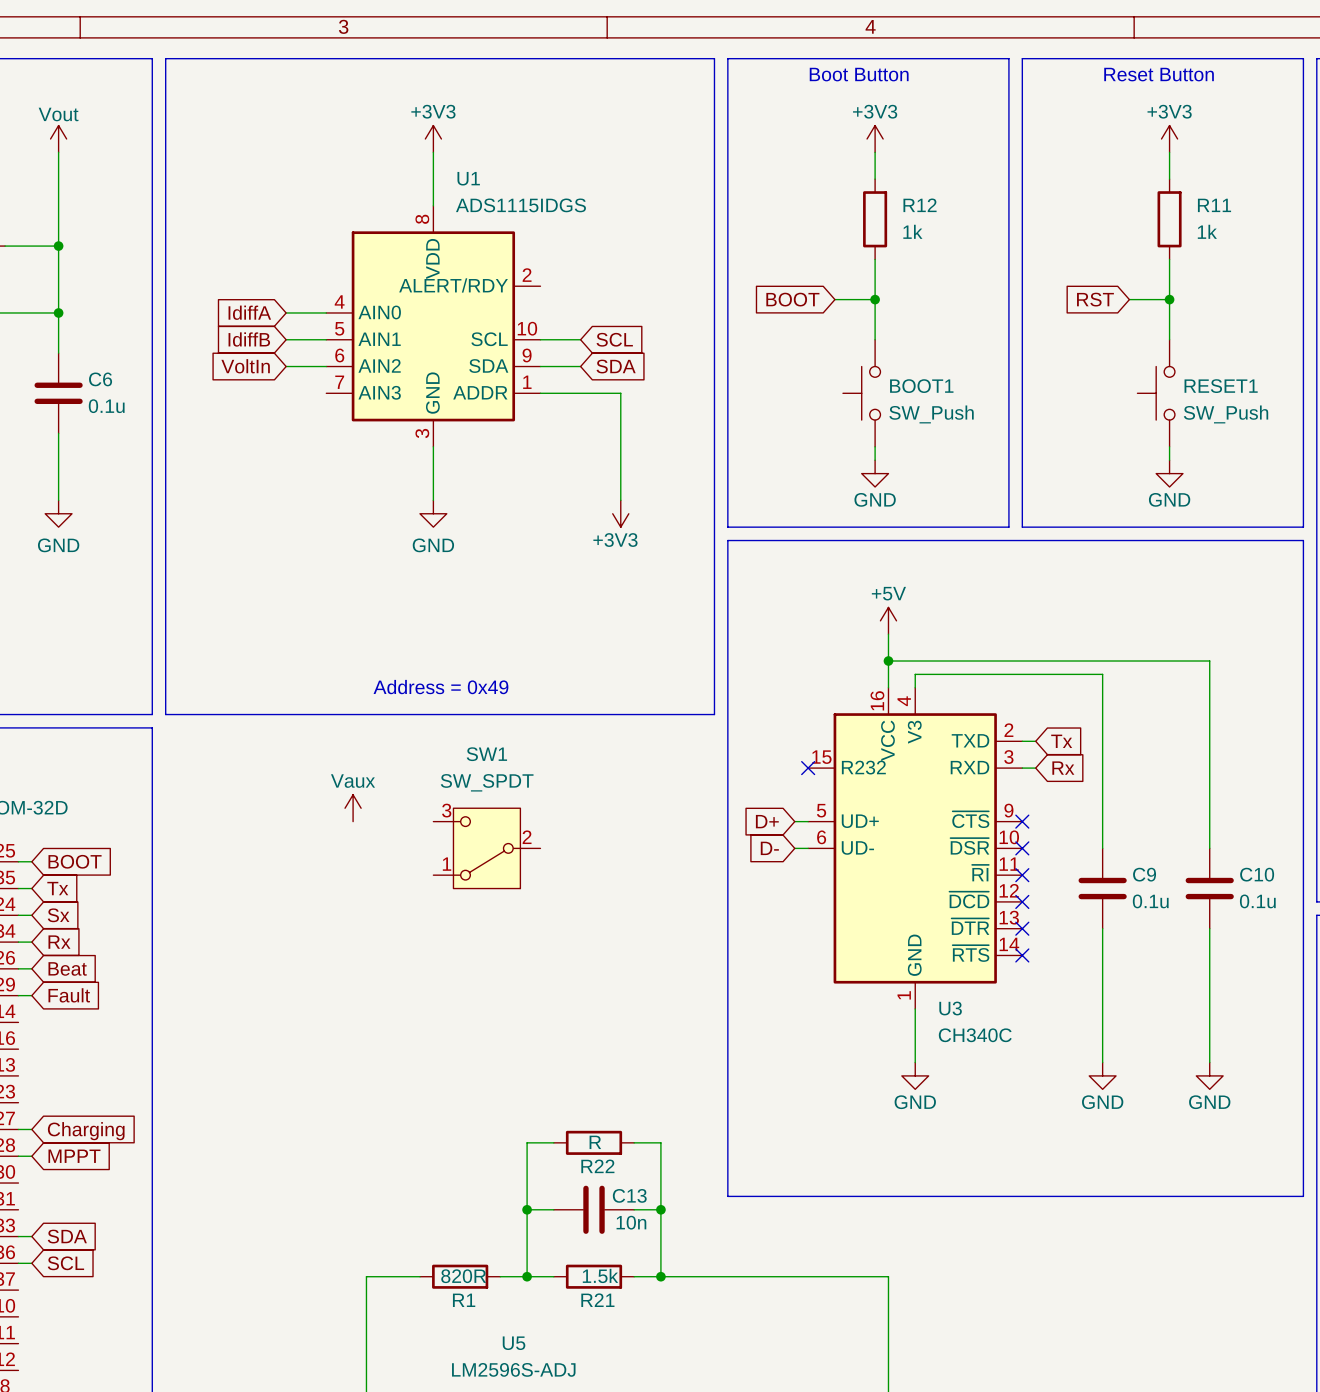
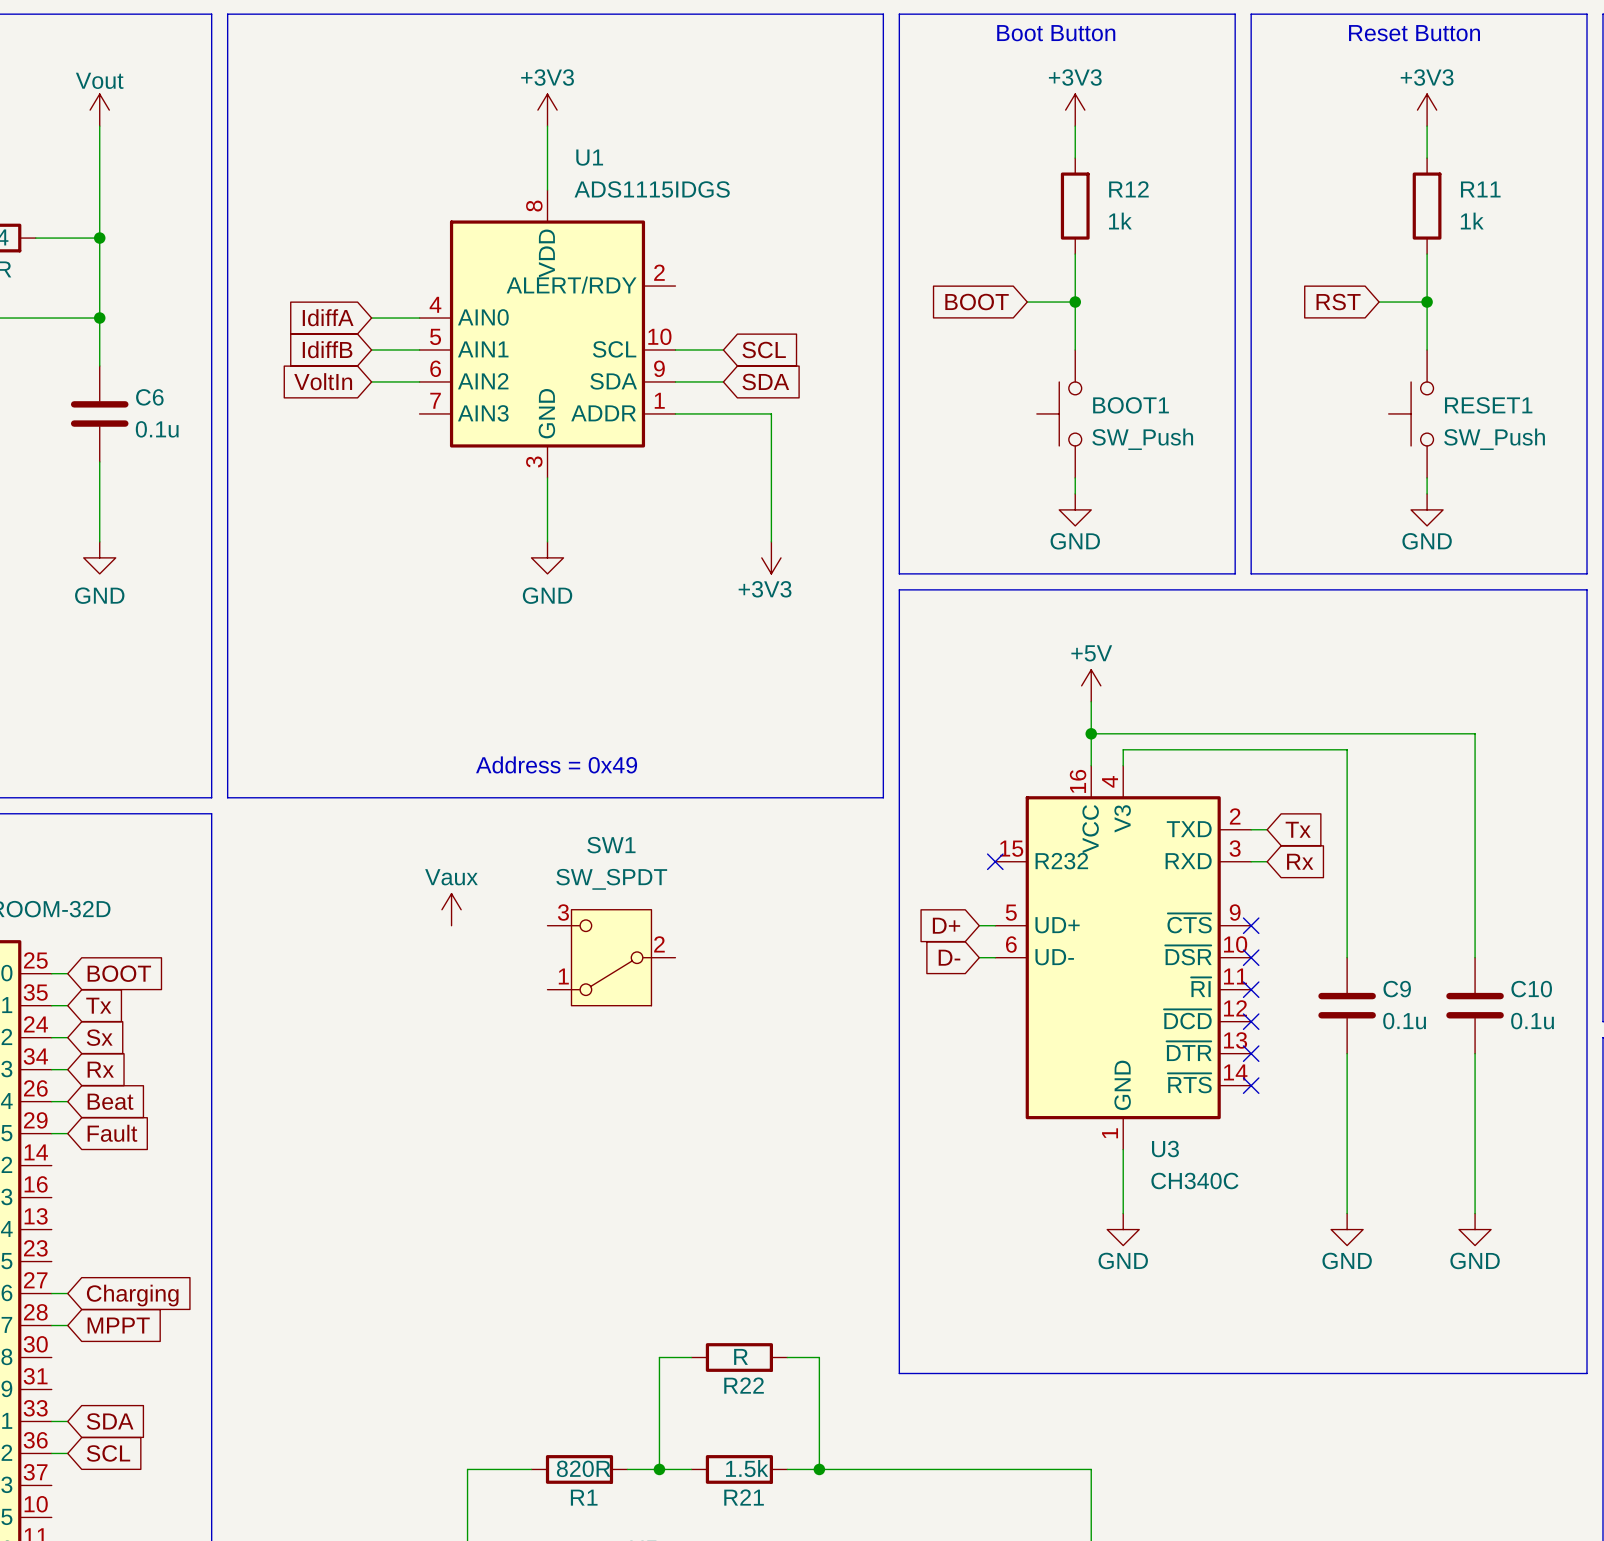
wire: (553, 1142) (527, 1142) (527, 1183) -> (691, 1357) (659, 1357)
R22 position: (594, 1142) -> (739, 1357)
wire: (634, 1142) (660, 1142) (660, 1183) -> (787, 1357) (819, 1357)
wire: (527, 1209) (553, 1209) -> none
junction: (527, 1209) -> none
C13: 10n (594, 1209) -> none
wire: (634, 1209) (660, 1209) -> none
junction: (660, 1209) -> none

